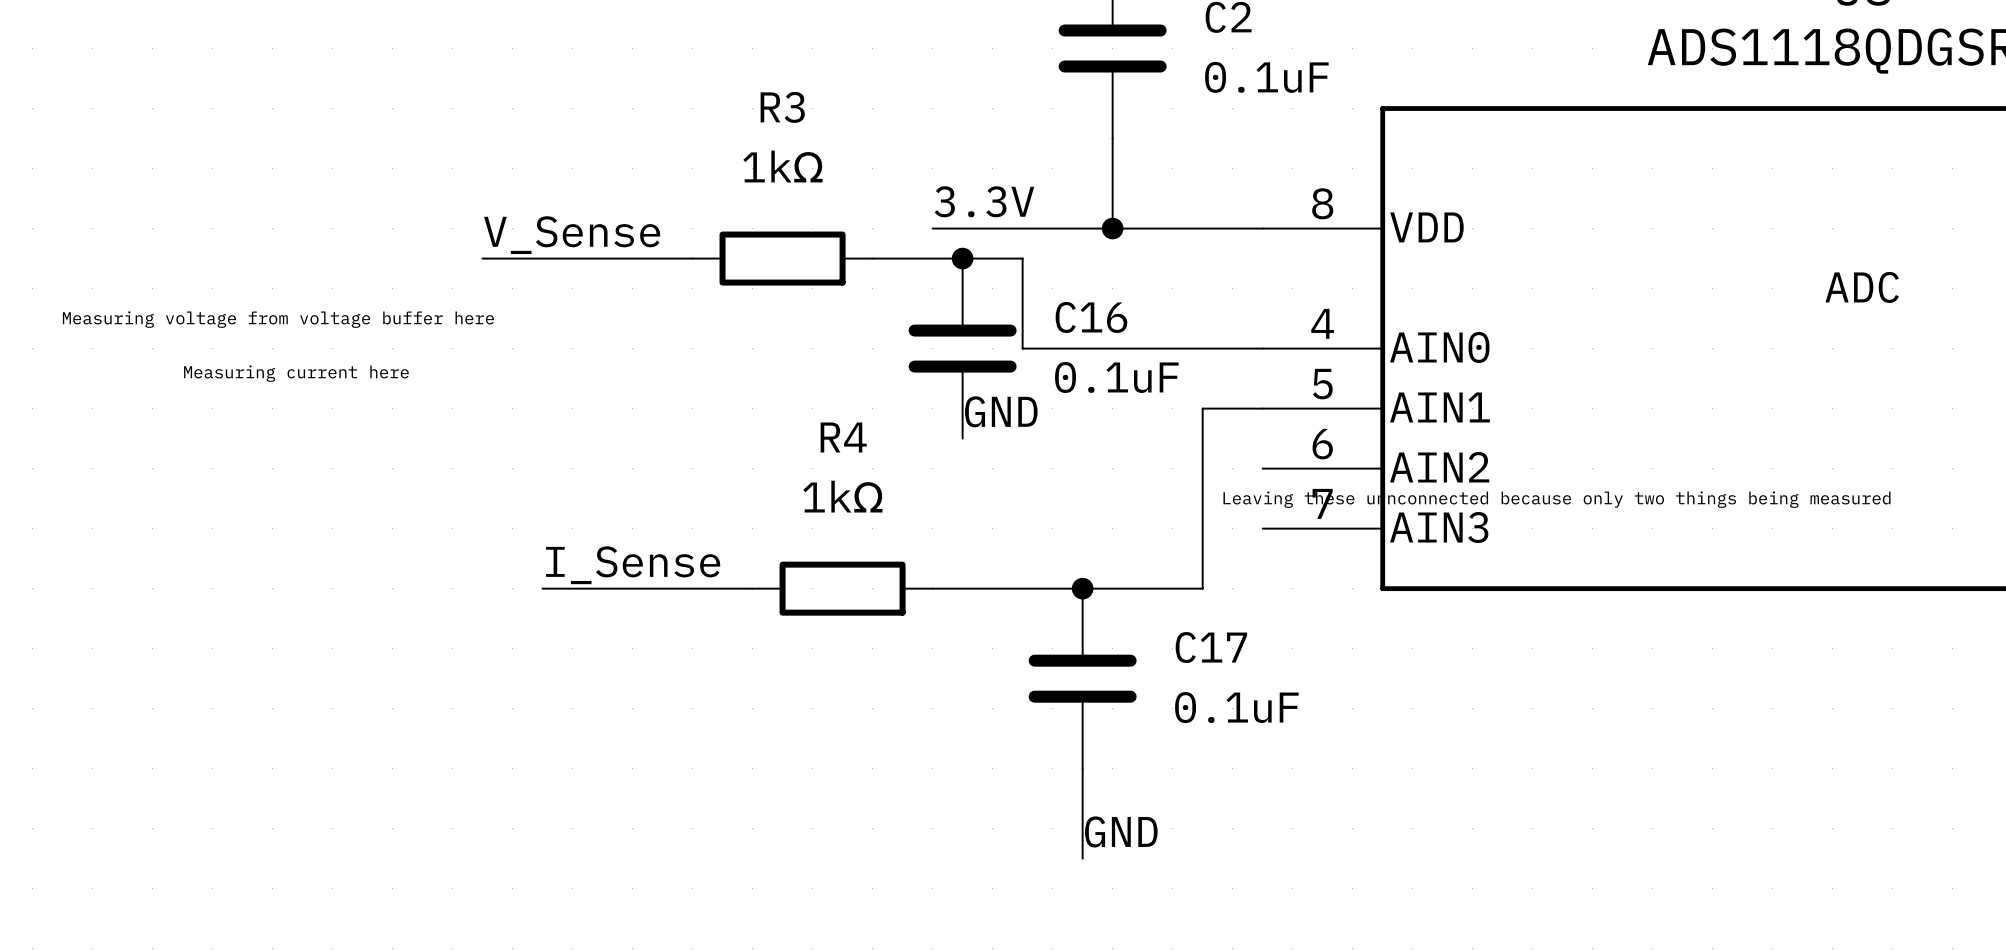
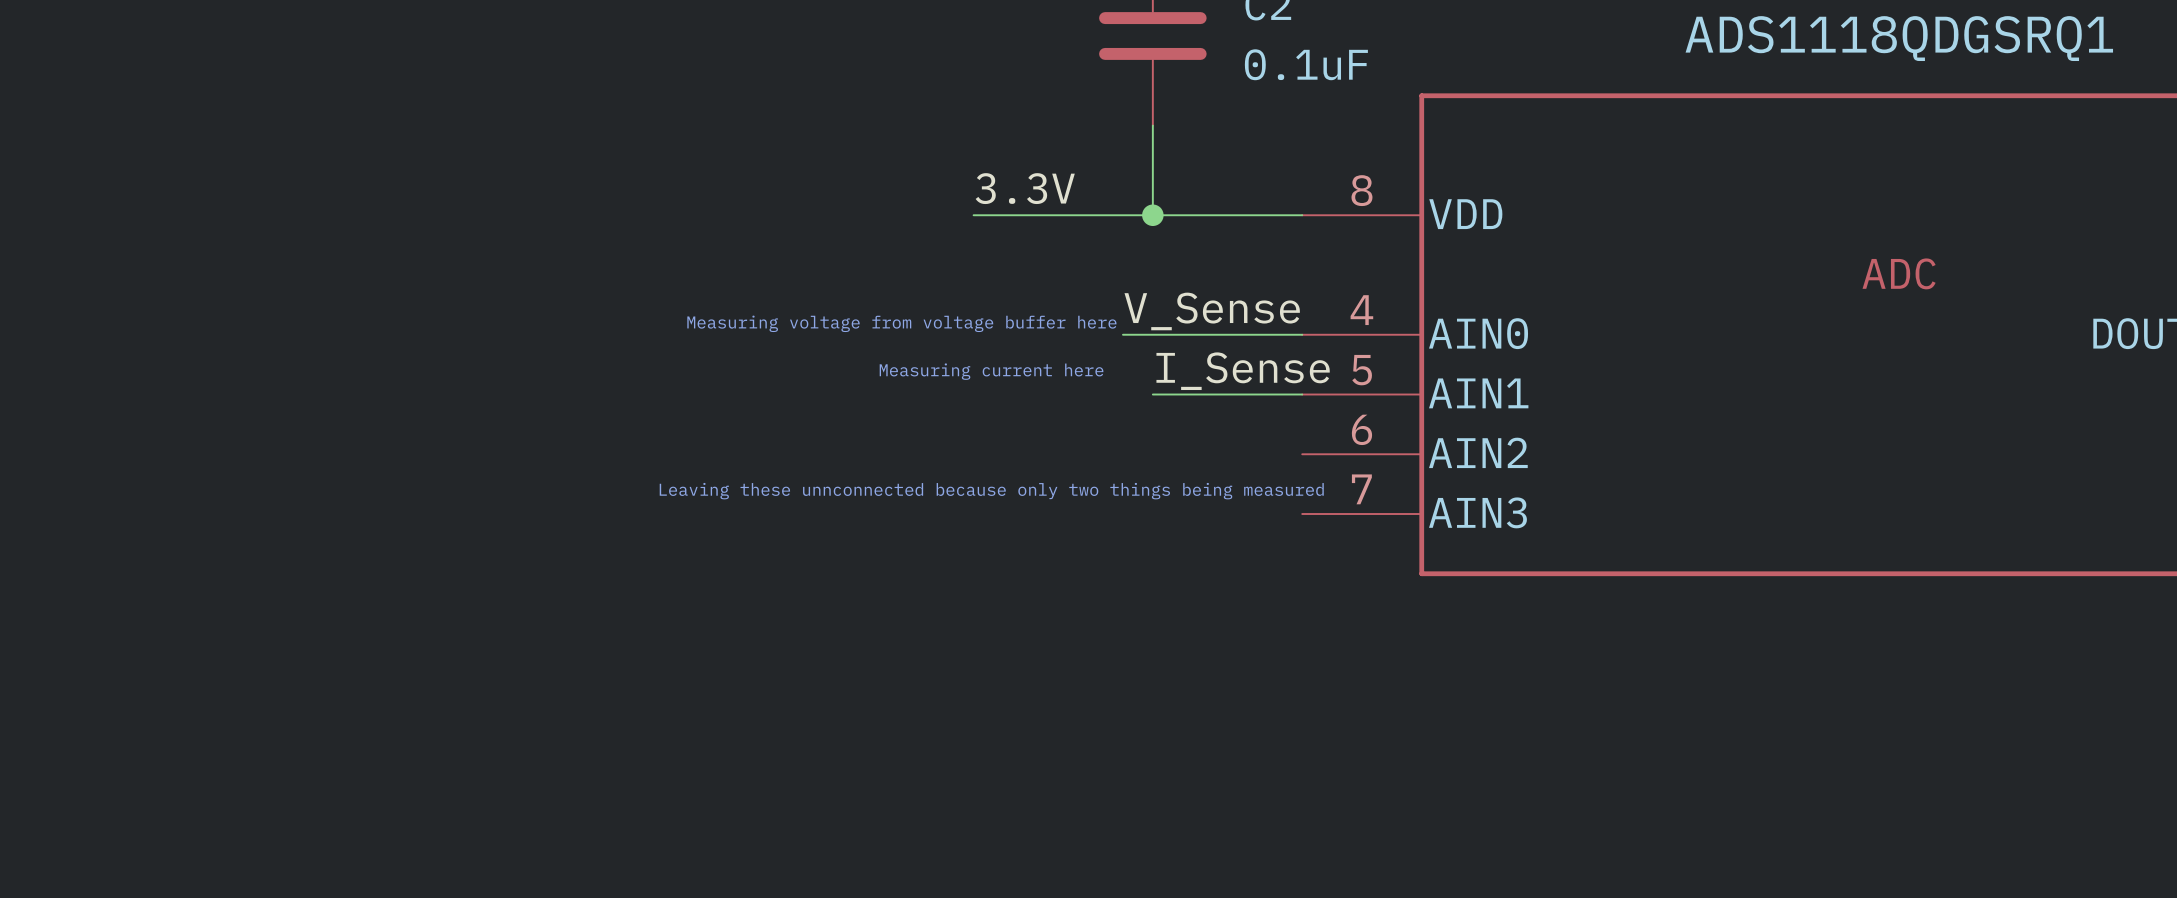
label: V_Sense (572, 235) -> none
wire: (482, 258) (692, 258) -> none
R3: 1kΩ (782, 258) -> none
wire: (872, 258) (1022, 258) (1022, 348) (1082, 348) -> none
junction: (962, 258) -> none
text position: Measuring voltage from voltage buffer here (278, 319) -> Measuring voltage from voltage buffer here (901, 323)
label: none -> V_Sense (1212, 311)
C16: 0.1uF (962, 348) -> none
text: Measuring current here (296, 373) -> none
text: none -> Measuring current here (991, 371)
label: none -> I_Sense (1243, 371)
wire: (1202, 408) (1202, 588) (932, 588) -> (1242, 394) (1152, 394)
label: GND (1001, 411) -> none
text: Leaving these unnconnected because only two things being measured (1556, 499) -> none
text: none -> Leaving these unnconnected because only two things being measured (991, 491)
label: I_Sense (633, 565) -> none
wire: (542, 588) (752, 588) -> none
R4: 1kΩ (842, 588) -> none
junction: (1082, 588) -> none
C17: 0.1uF (1082, 678) -> none
wire: (1082, 768) (1082, 858) -> none
label: GND (1121, 831) -> none

